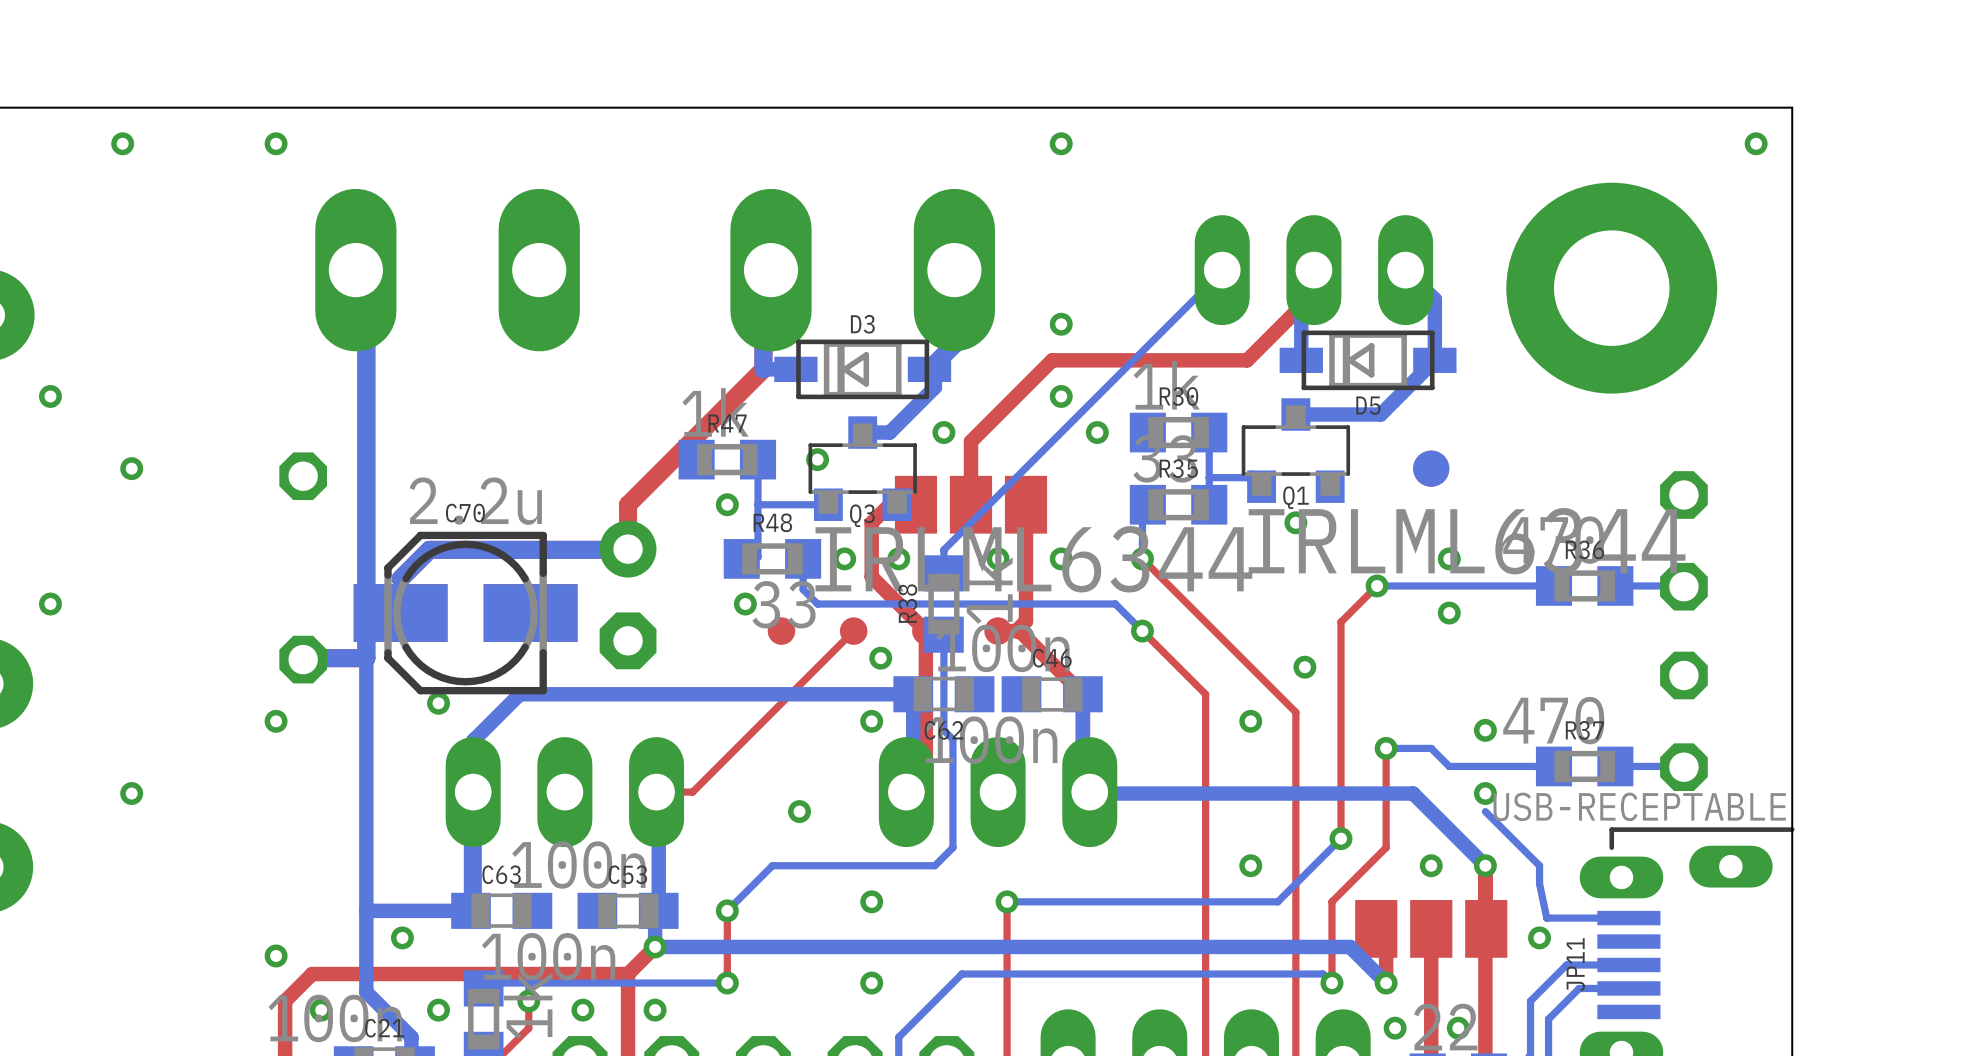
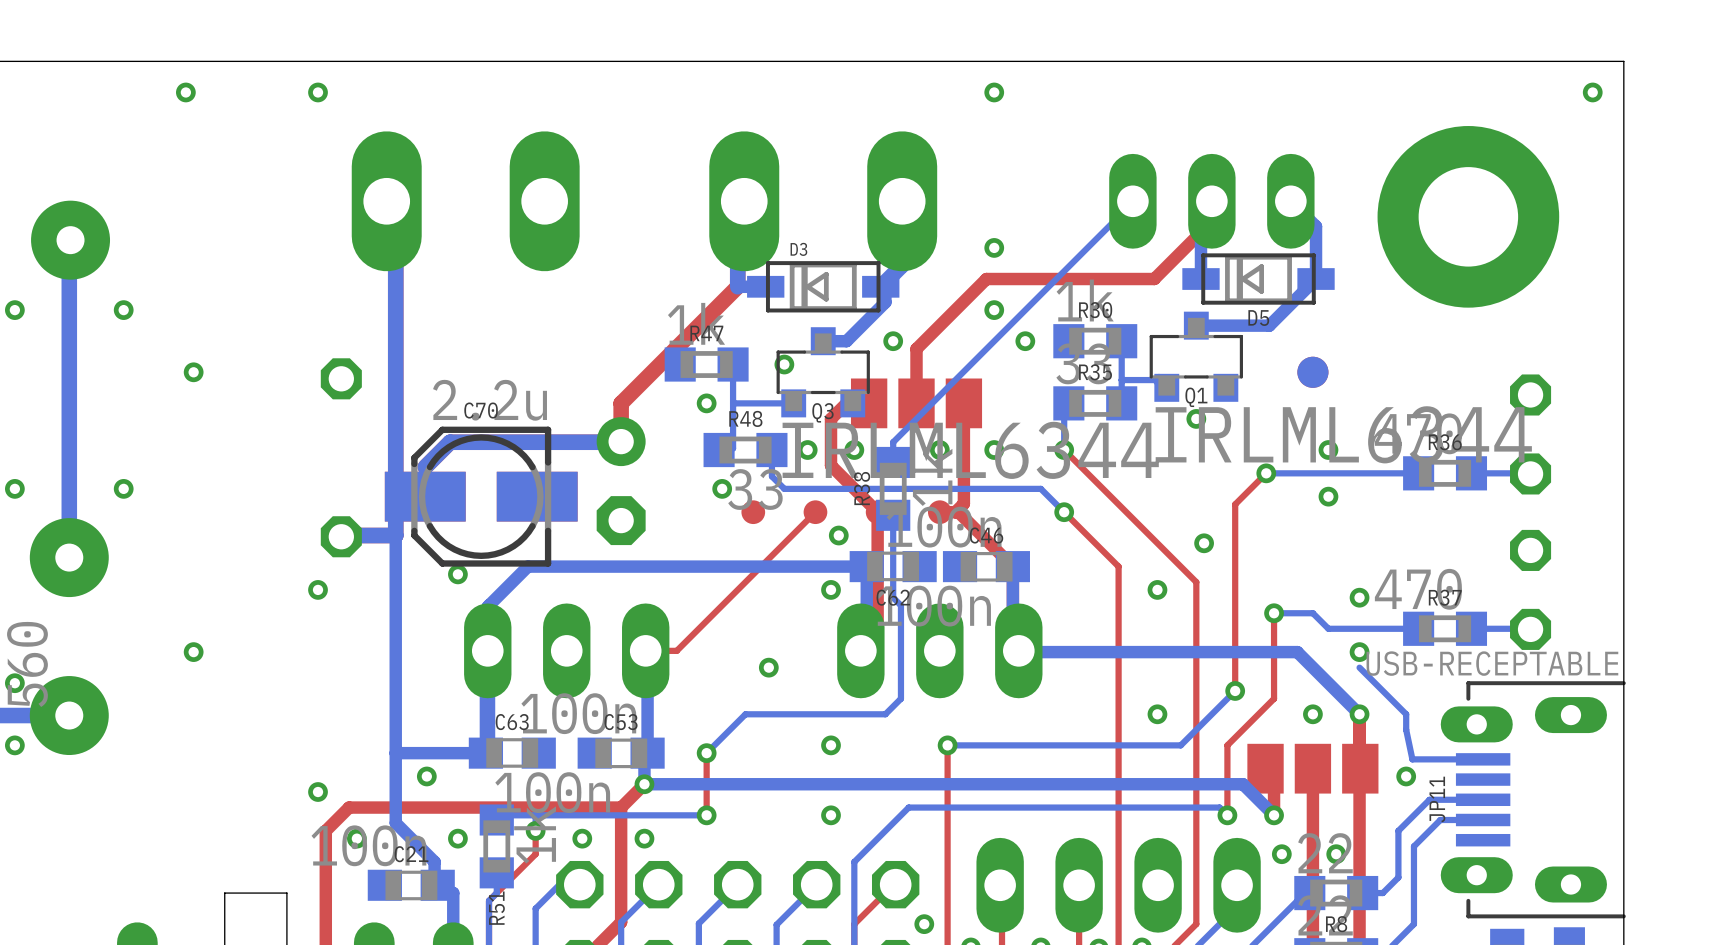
D3 name position: D3 (862, 324) -> D3 (798, 249)

